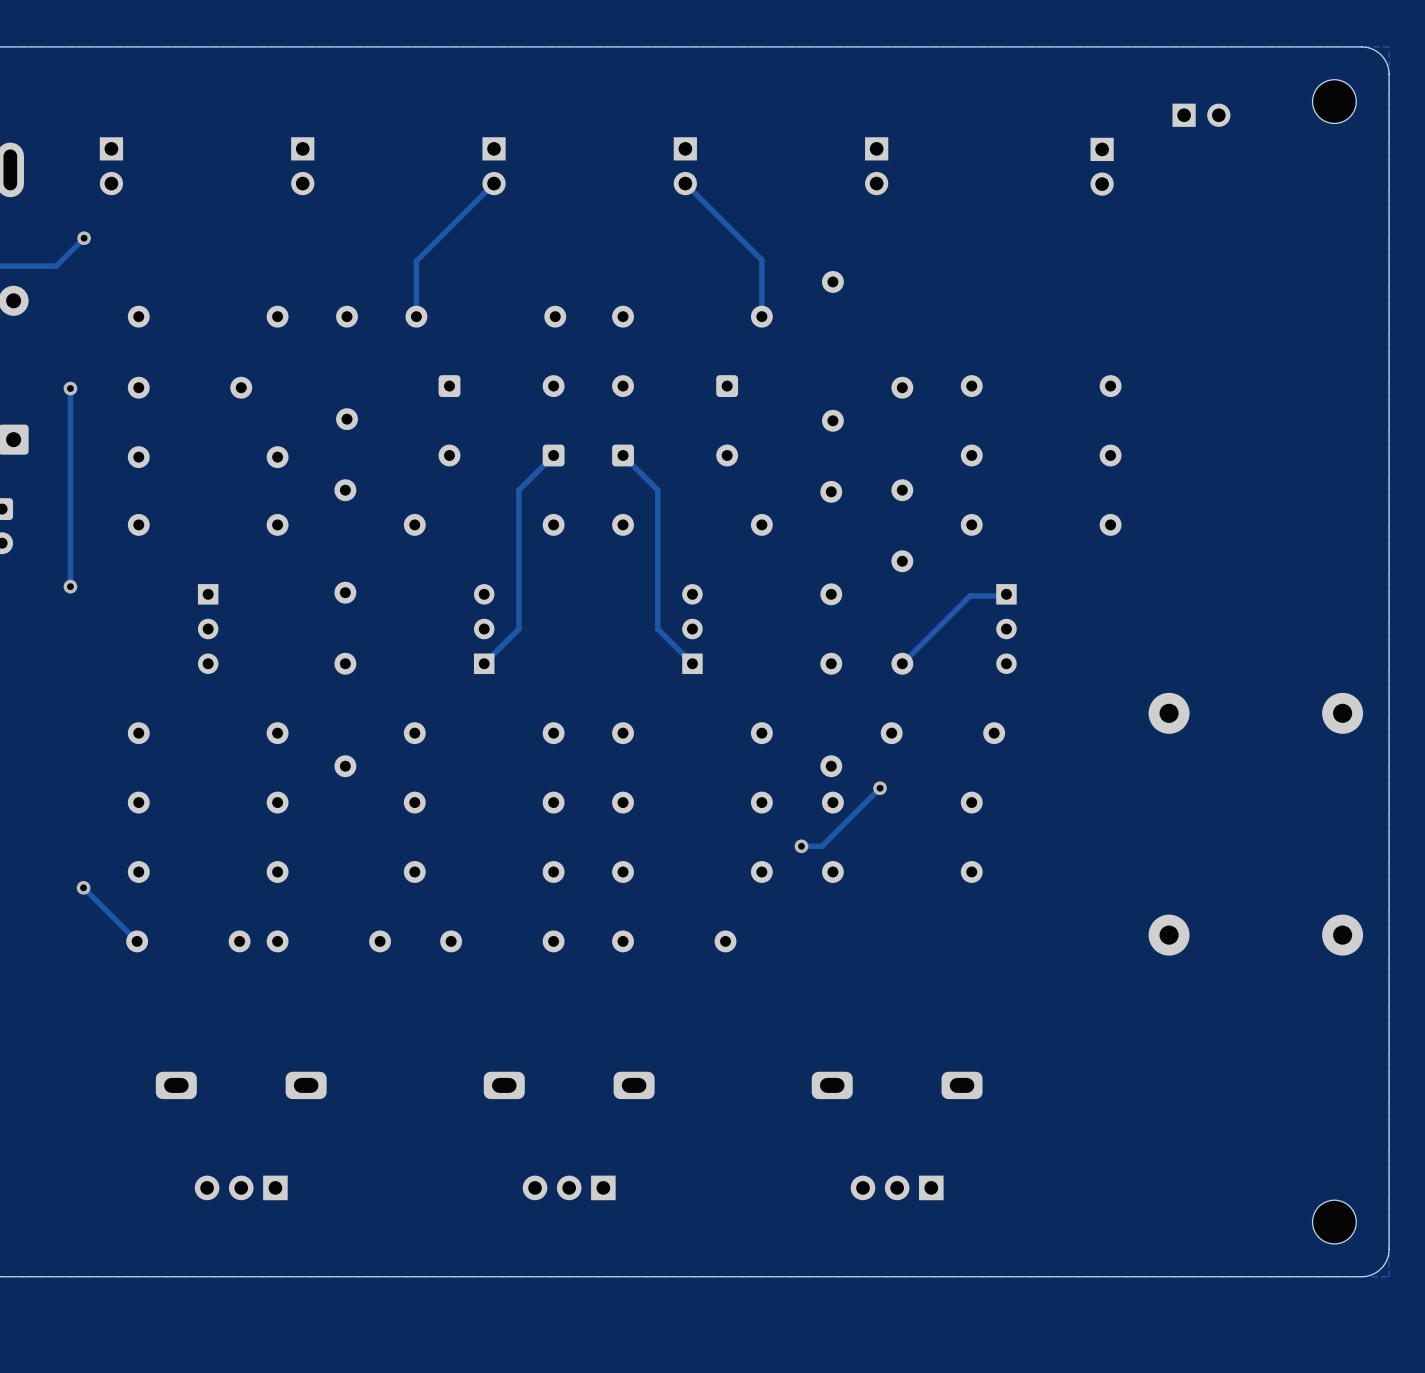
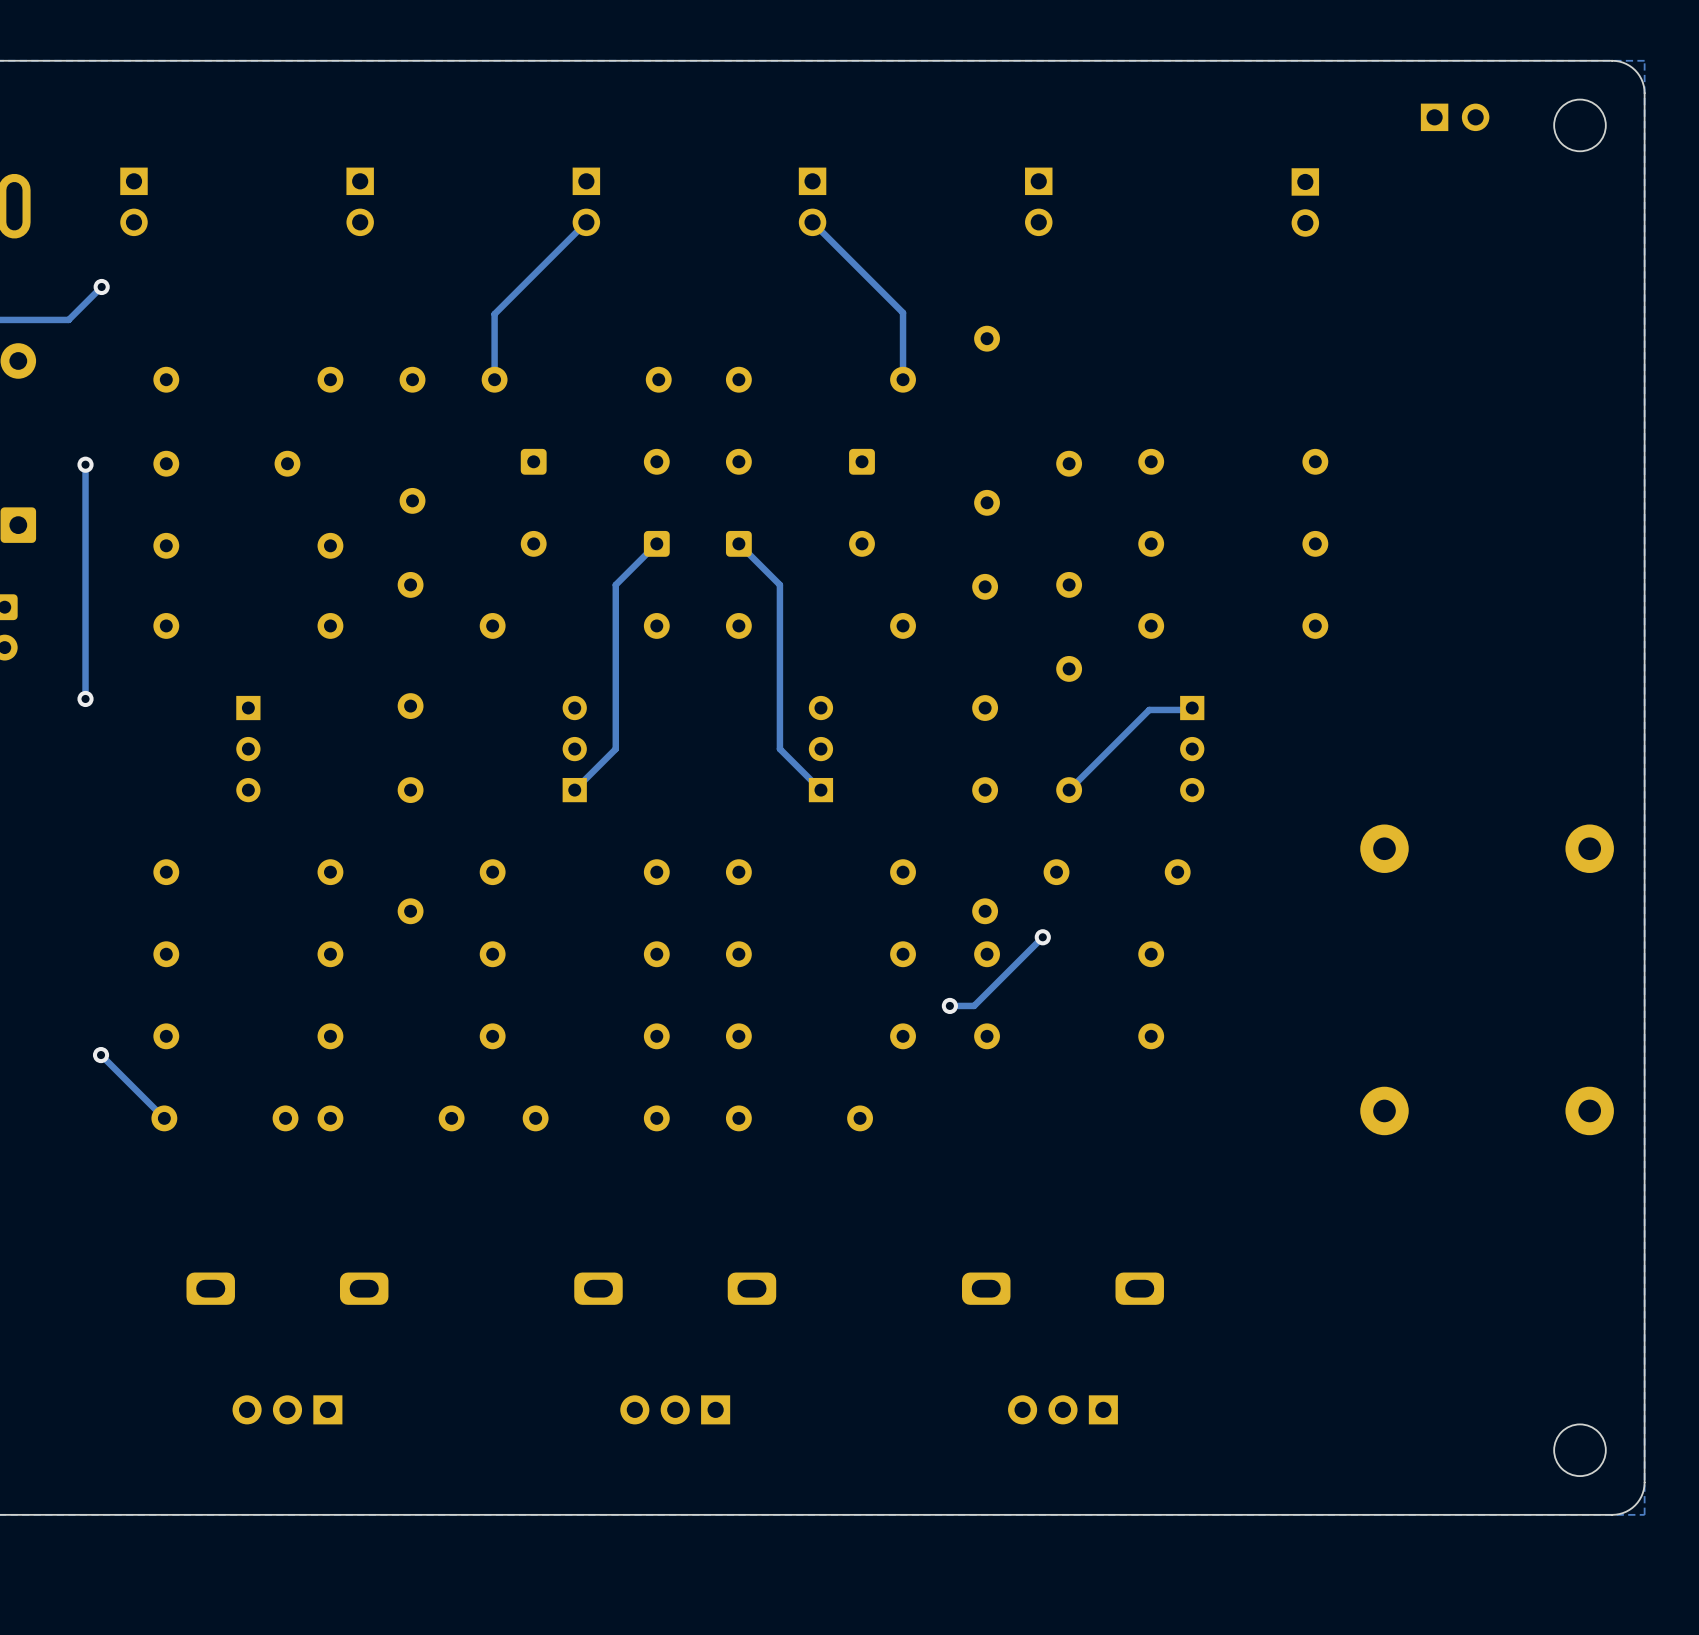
part position: (1201, 115) -> (1455, 117)

